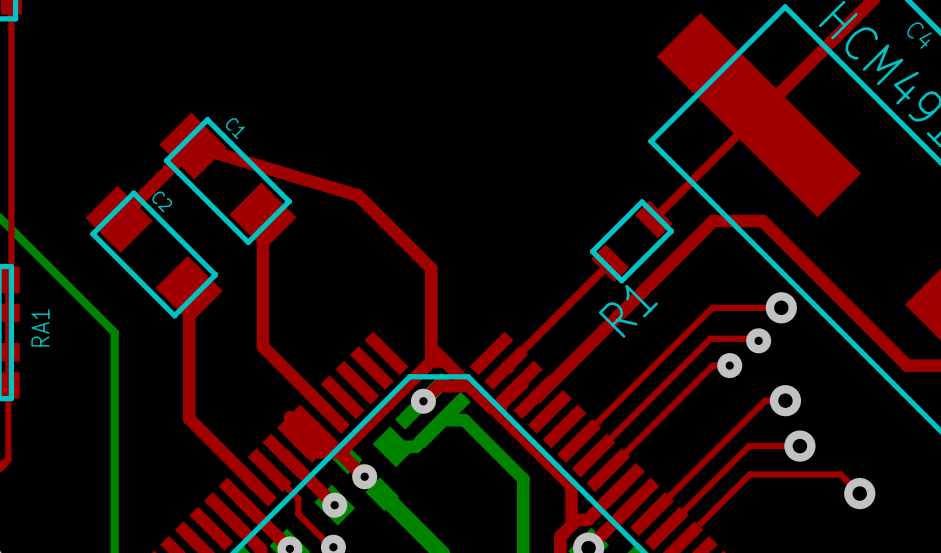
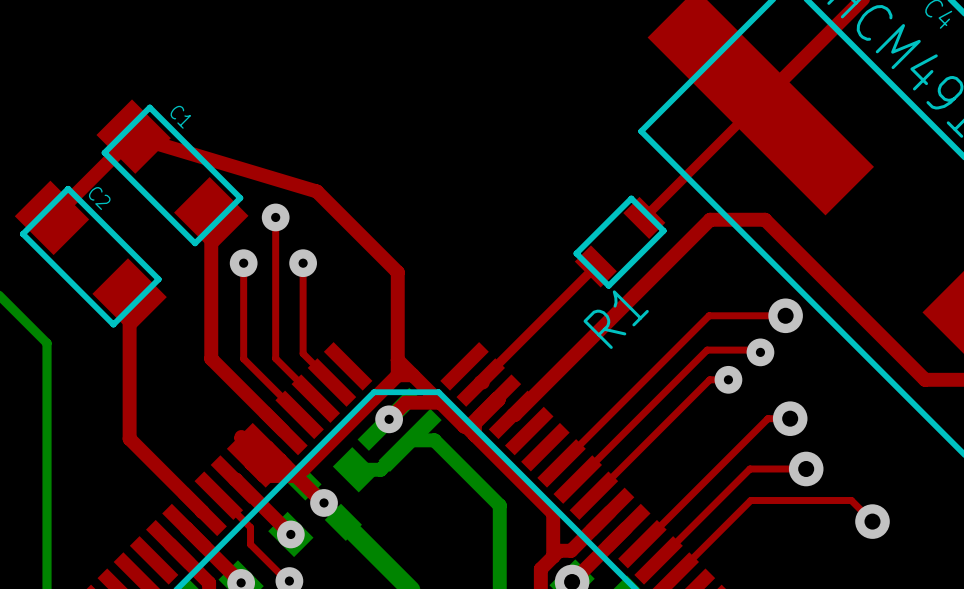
top track: none -> (275, 217) (275, 358) (315, 398)
via: none -> (275, 217)
top track: none -> (243, 263) (243, 358) (299, 414)
via: none -> (243, 263)
top track: none -> (303, 263) (303, 353) (331, 382)
via: none -> (303, 263)

